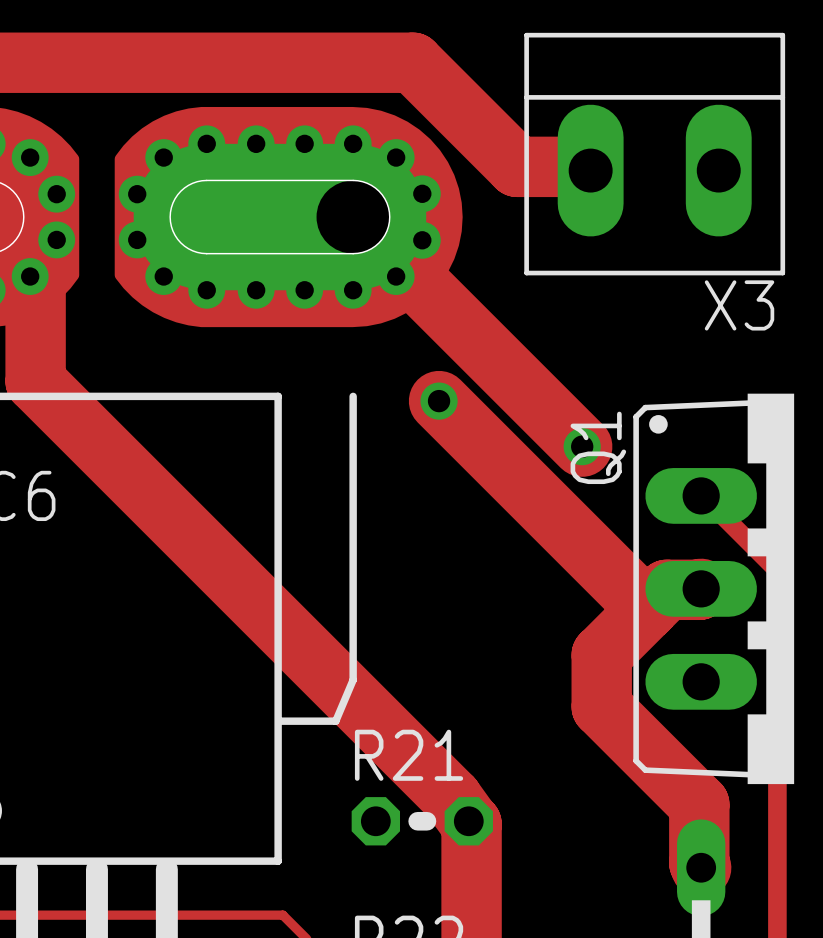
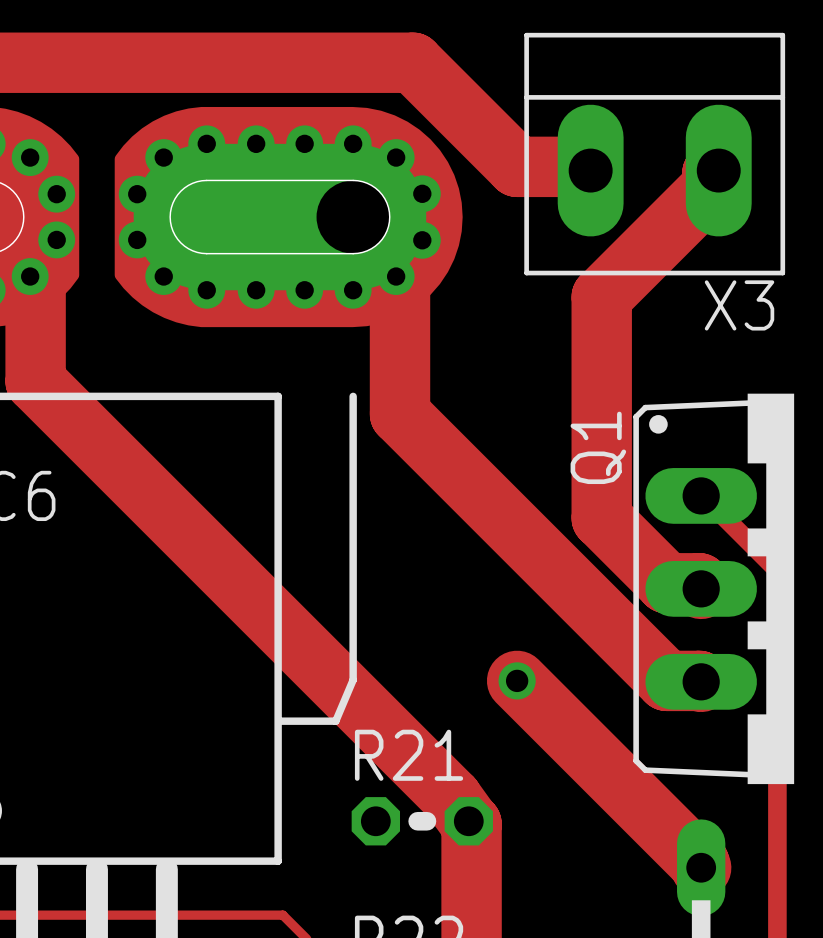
track: none -> (718, 170) (712, 173) (712, 186) (601, 296) (601, 518) (666, 583) (699, 583) (701, 588)
track: (400, 277) (413, 277) (582, 446) -> (400, 277) (400, 414) (666, 680) (701, 681)
track: (439, 401) (647, 609) -> none
via: (439, 401) -> none
via: (582, 446) -> none
track: (701, 588) (666, 589) (601, 654) (601, 706) (699, 804) (699, 863) -> (517, 680) (699, 863)
via: none -> (517, 680)

